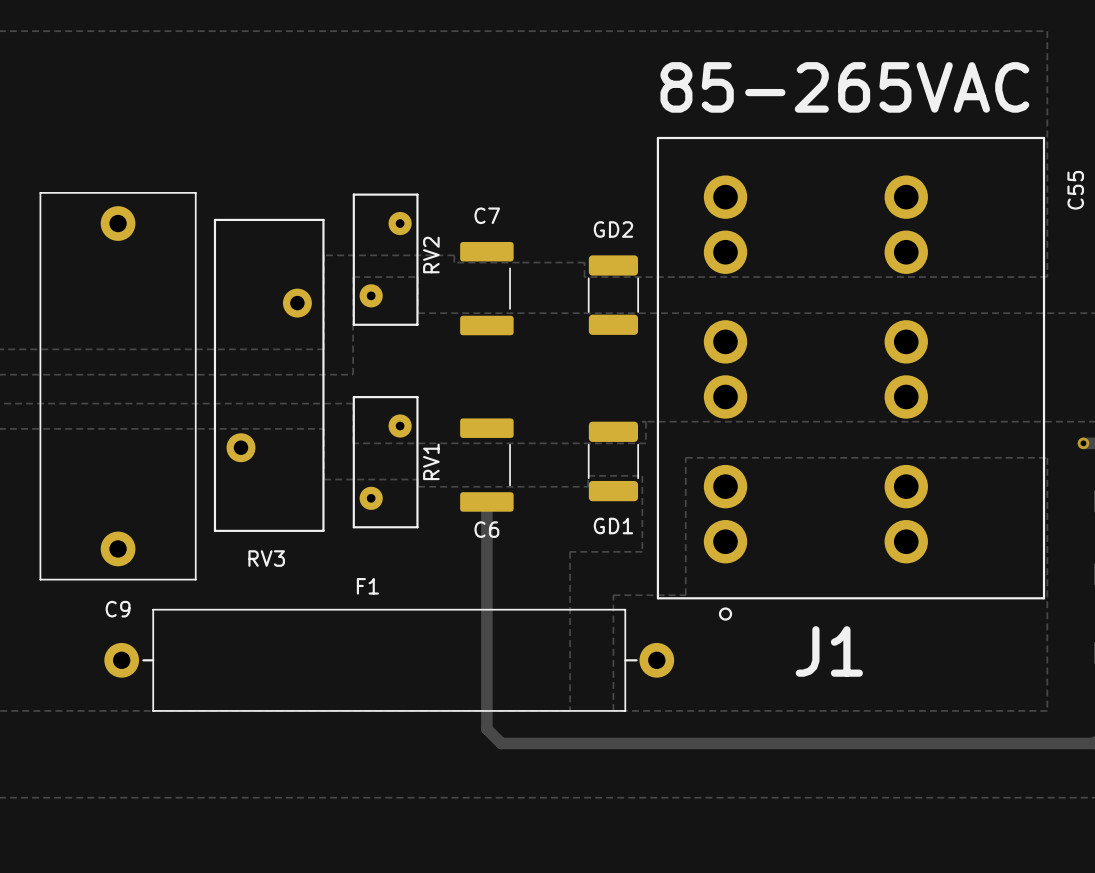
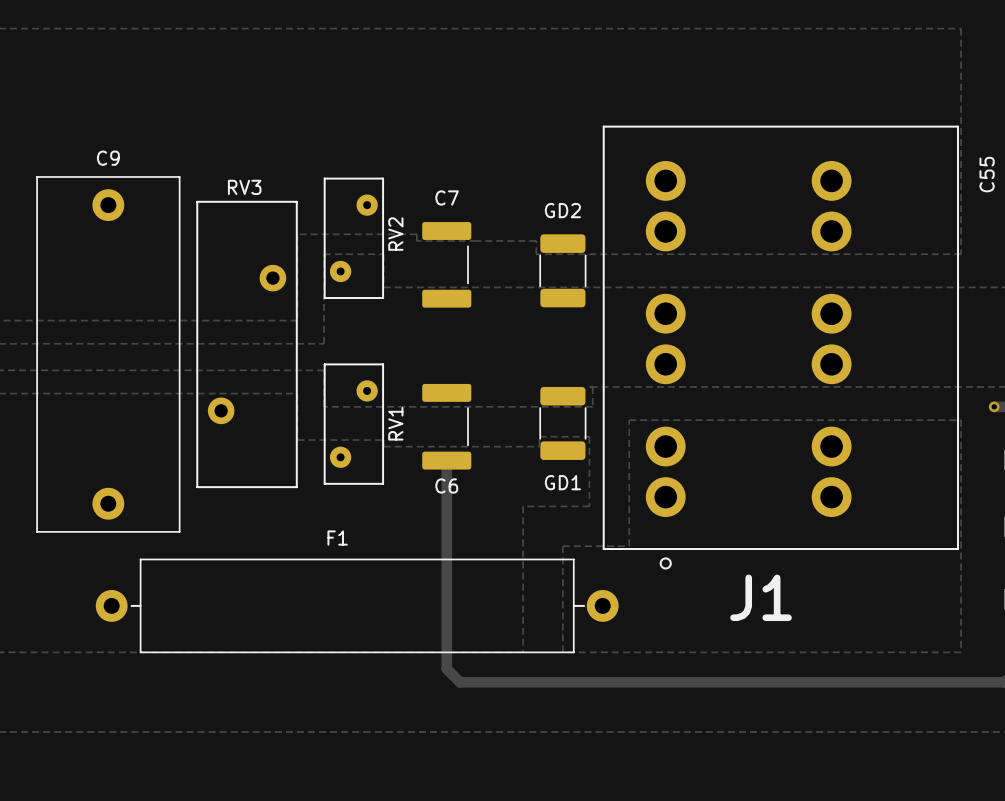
text: 85-265VAC (844, 87) -> none
RV3 name position: RV3 (266, 558) -> RV3 (244, 187)
C9 name position: C9 (118, 609) -> C9 (108, 158)

